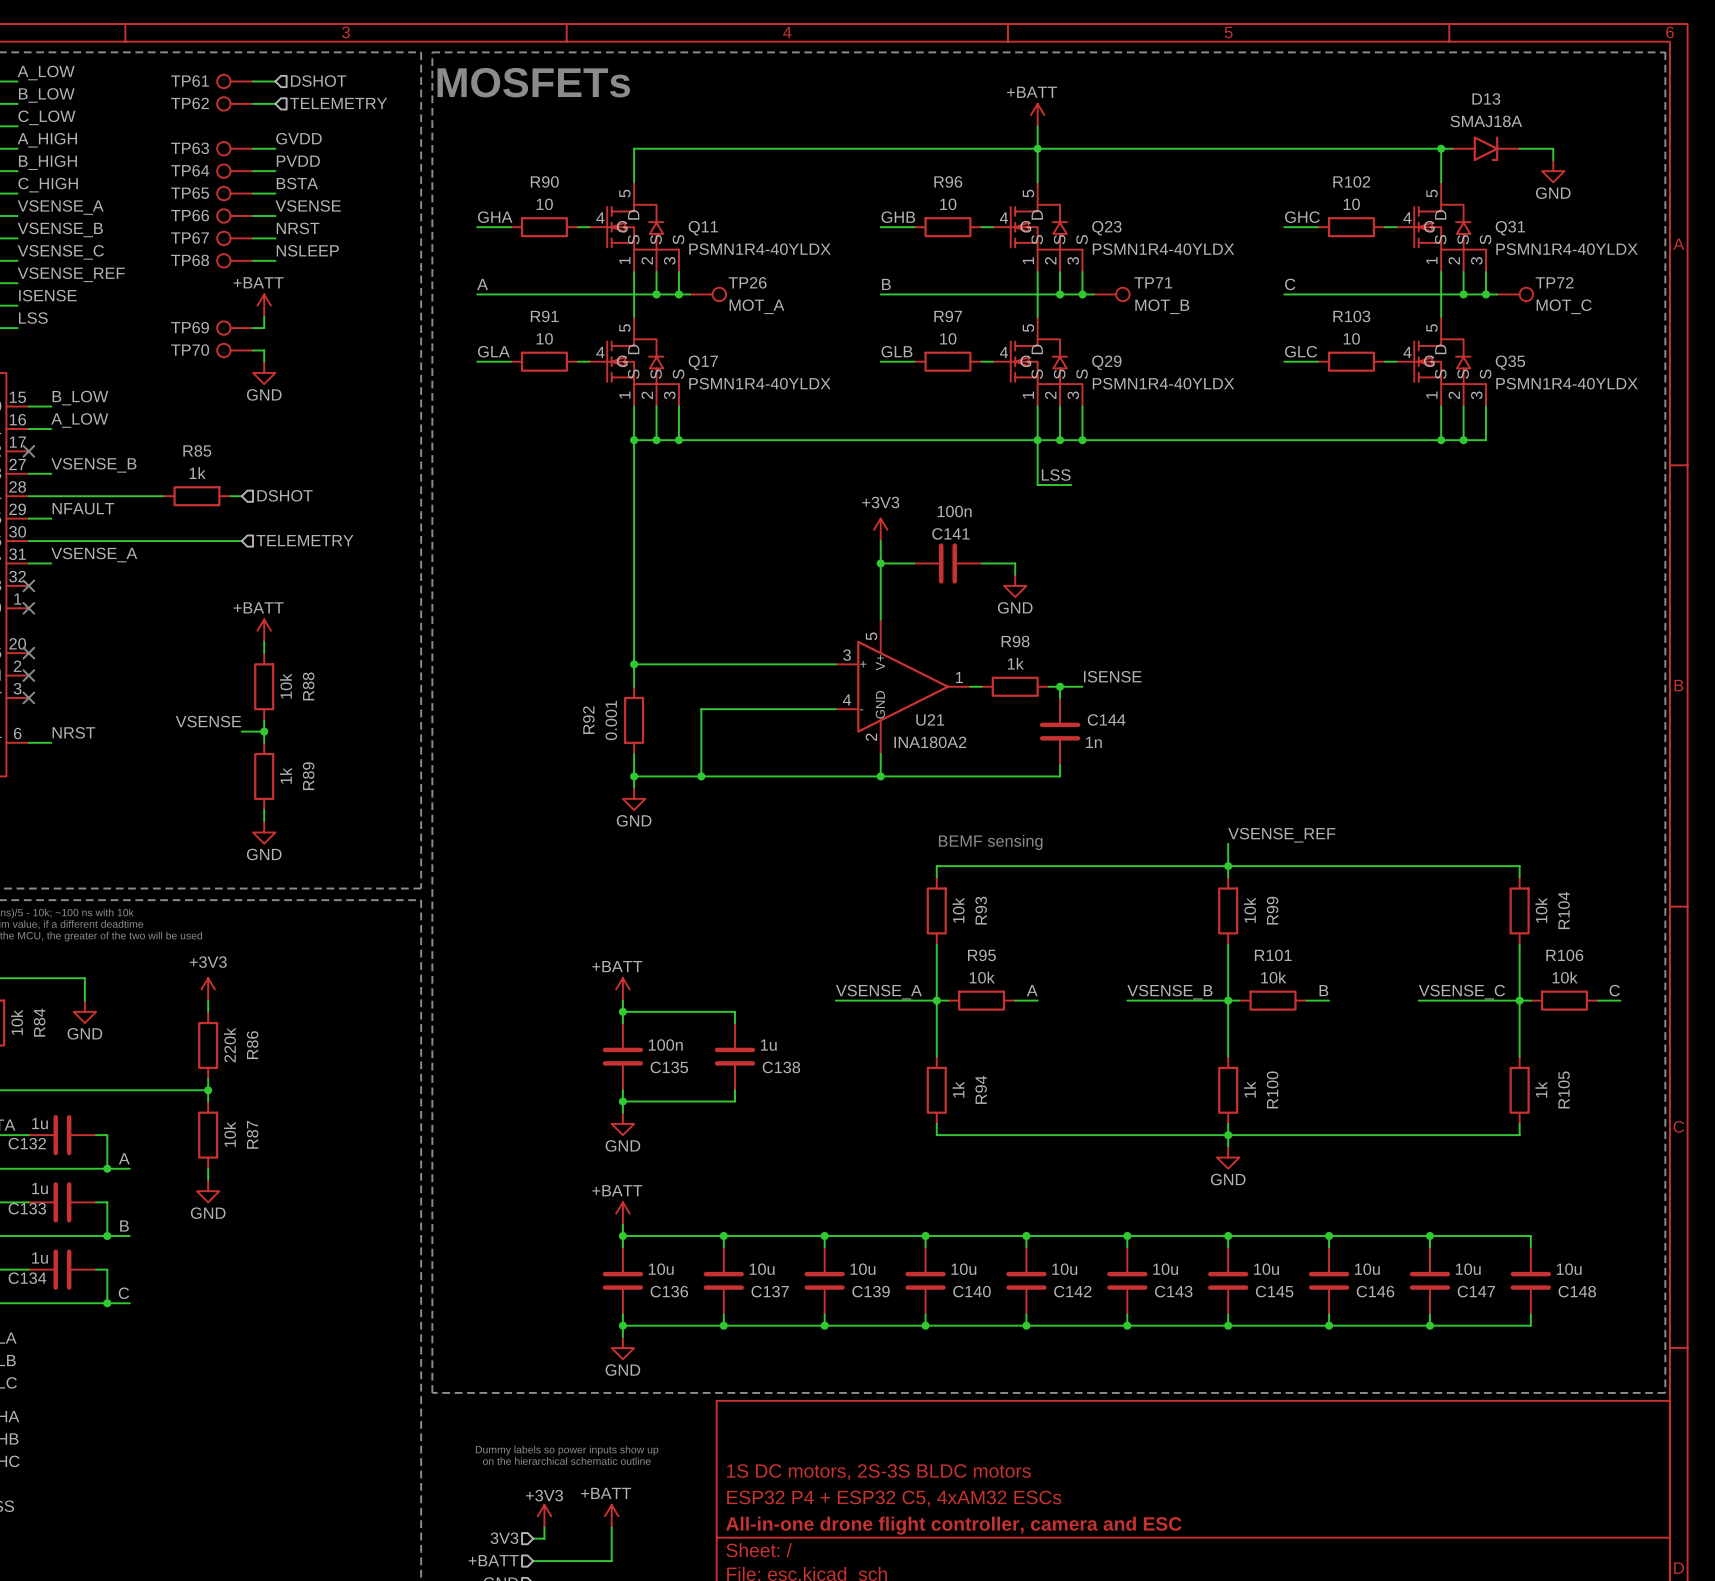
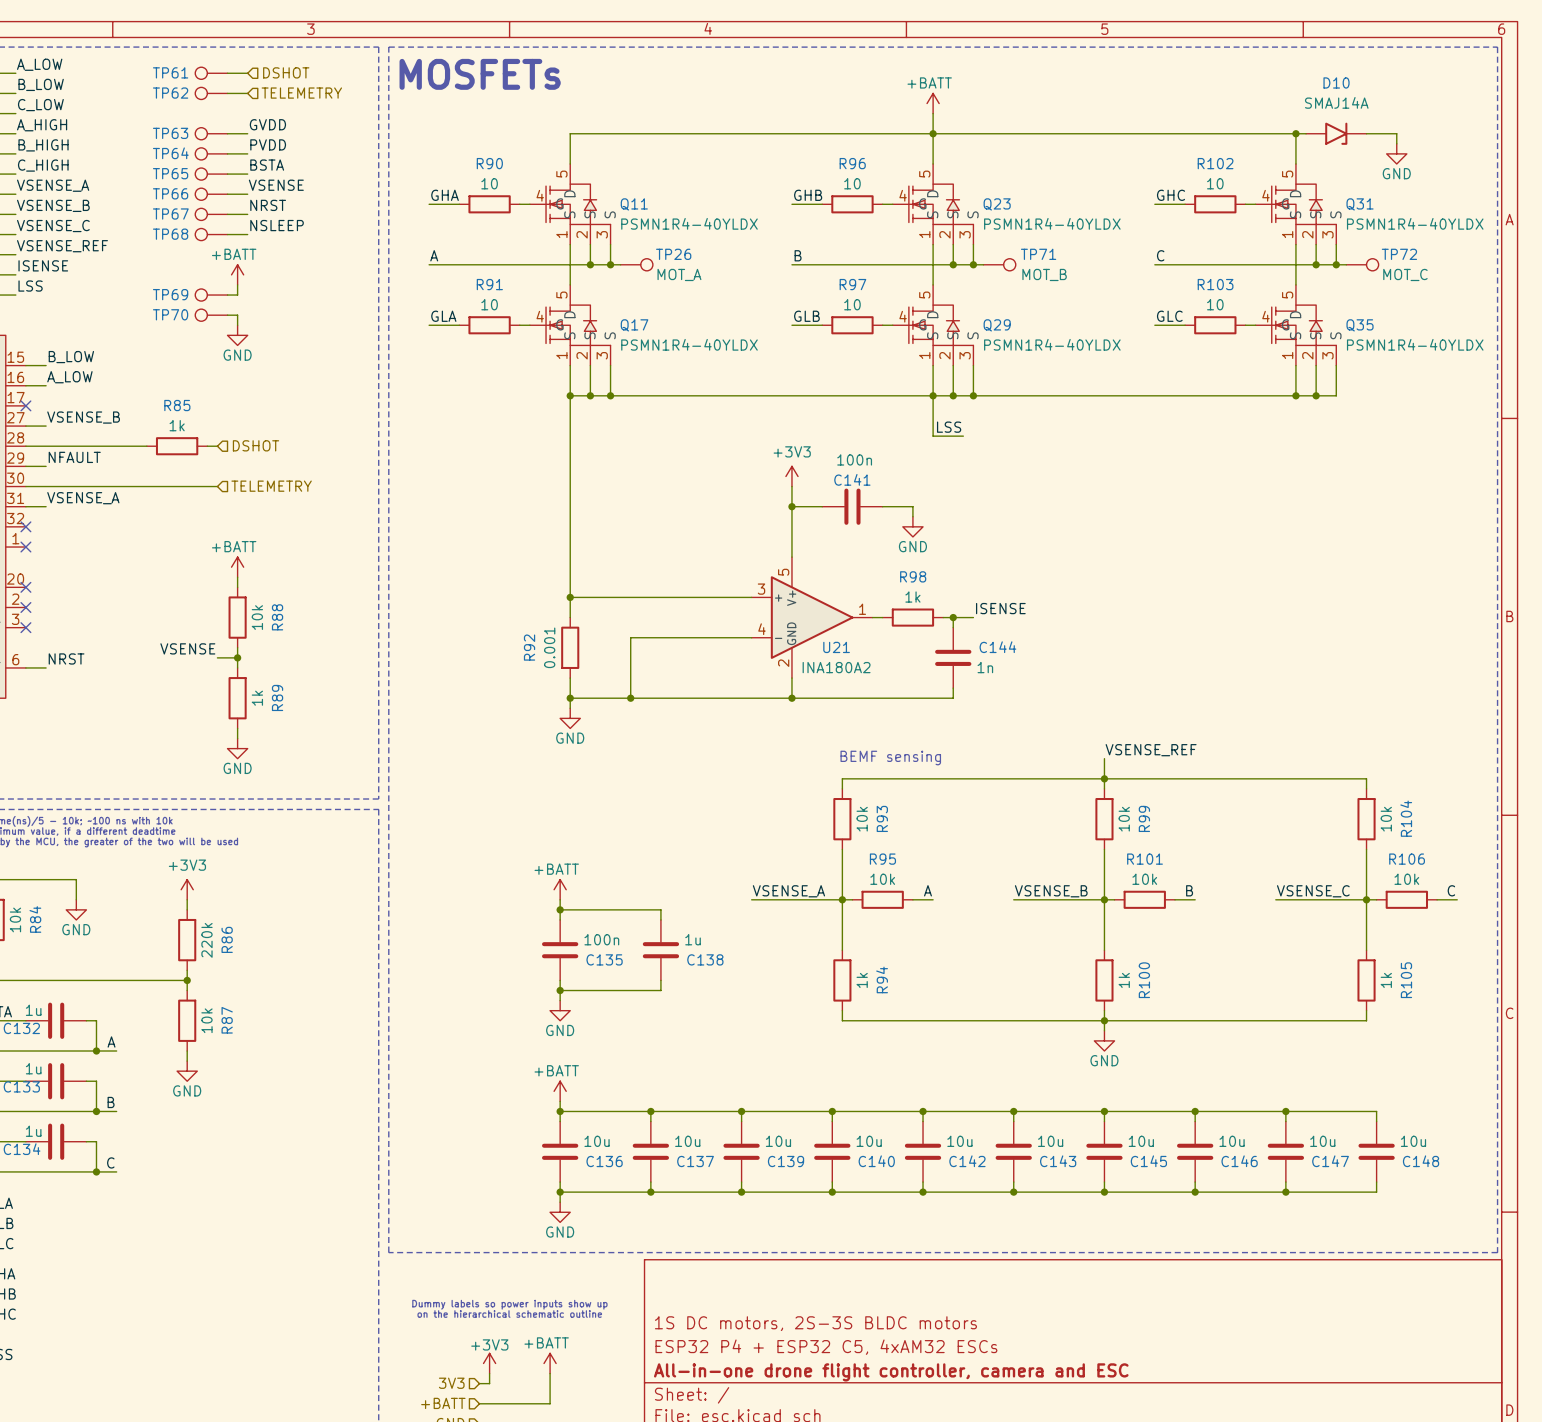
D13 name: D13 (1486, 98) -> D10 (1336, 82)
D13 value: SMAJ18A (1486, 121) -> SMAJ14A (1336, 102)

